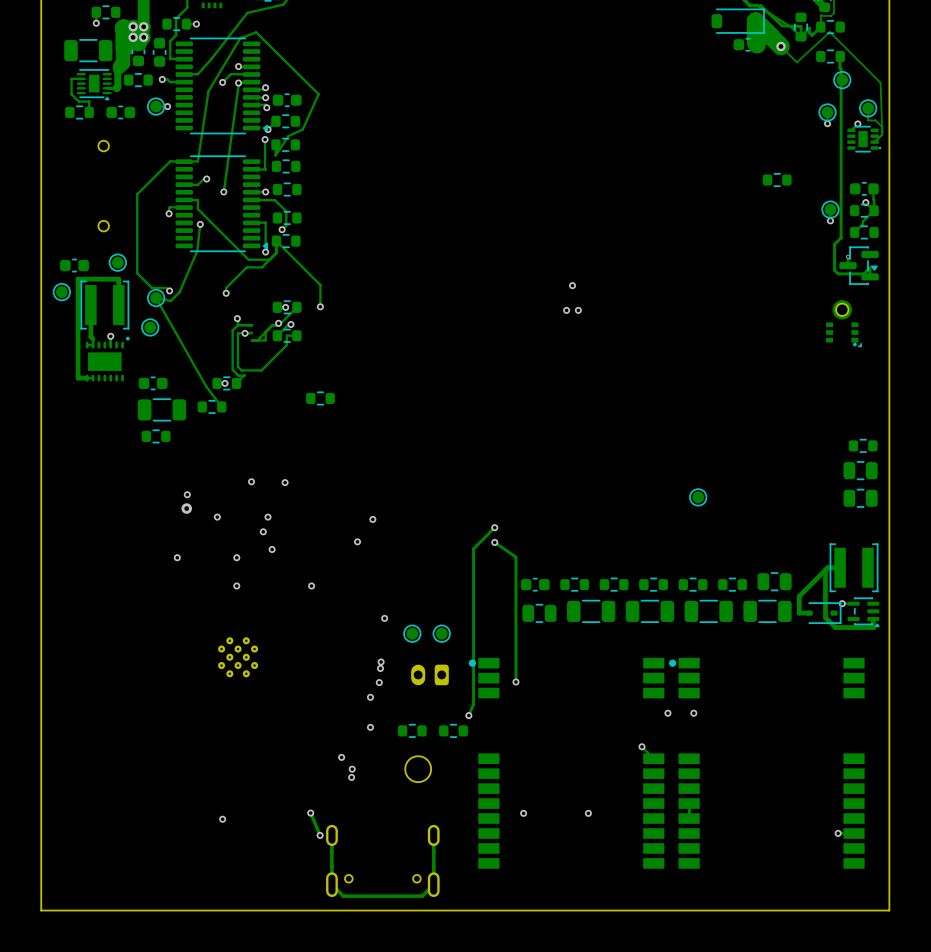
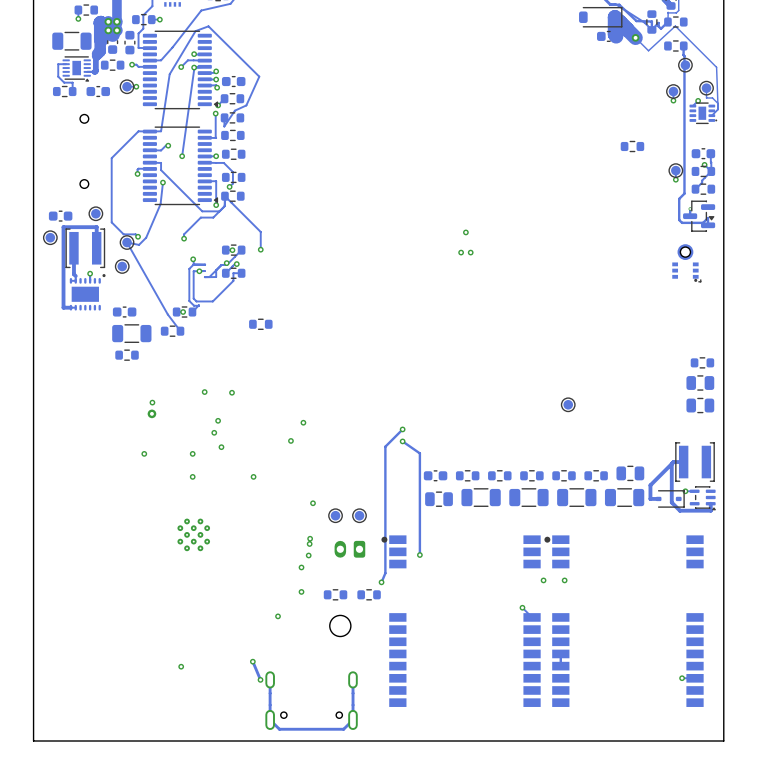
via: (217, 517) -> none
via: (352, 769) -> none
via: (351, 777) -> none
via: (523, 813) -> none
via: (588, 813) -> none

